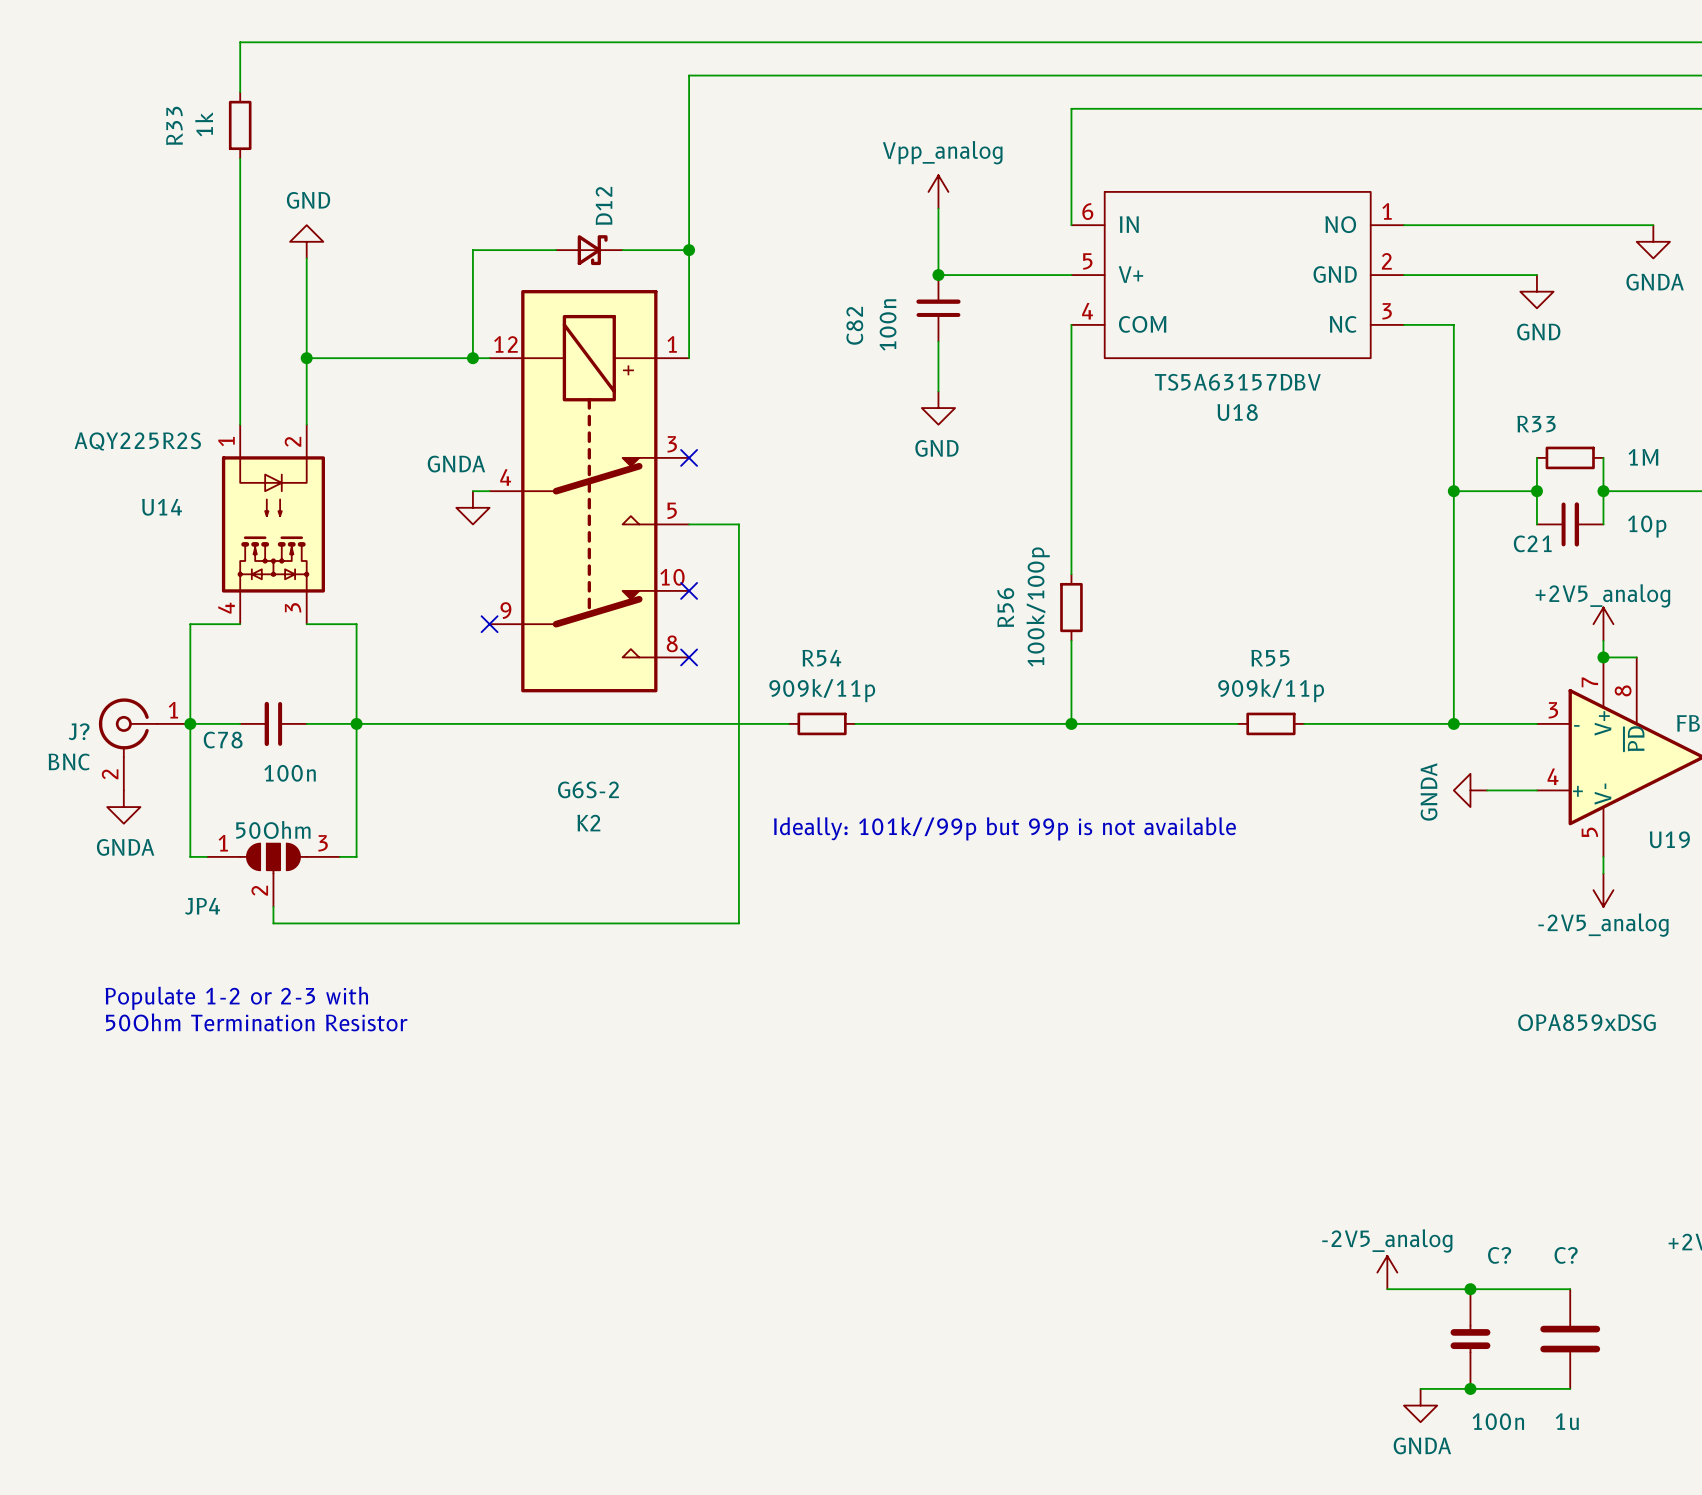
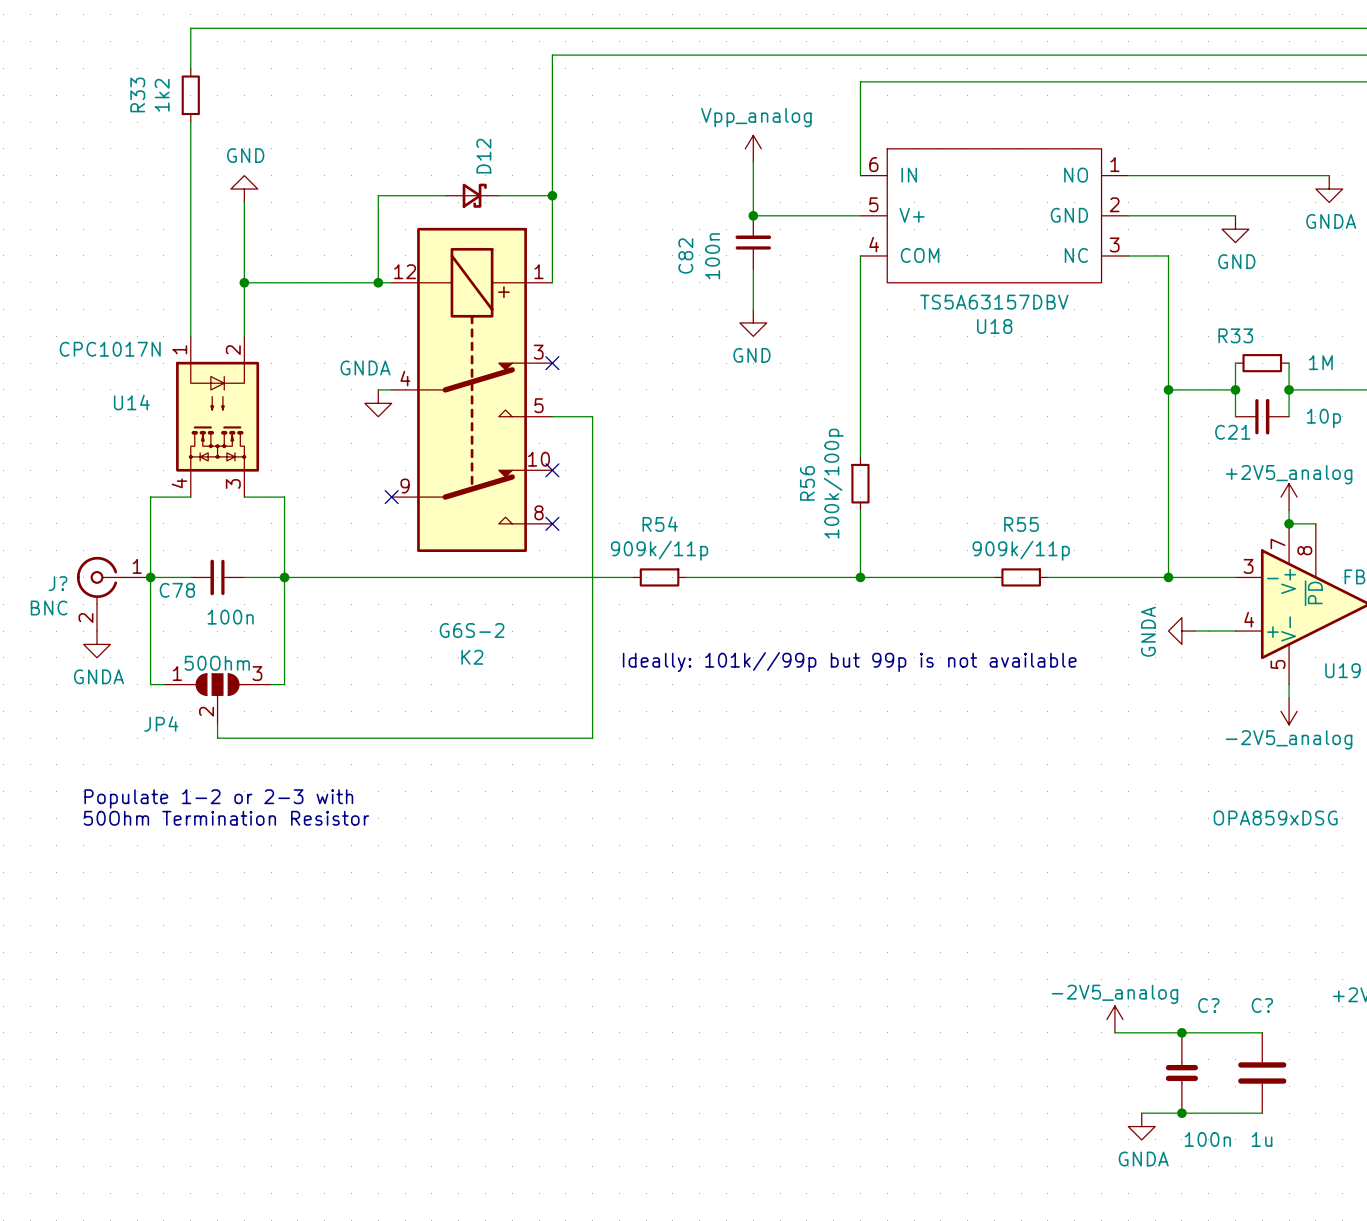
R33 value: 1k (204, 124) -> 1k2 (162, 95)
U14 value: AQY225R2S (137, 441) -> CPC1017N (110, 349)

